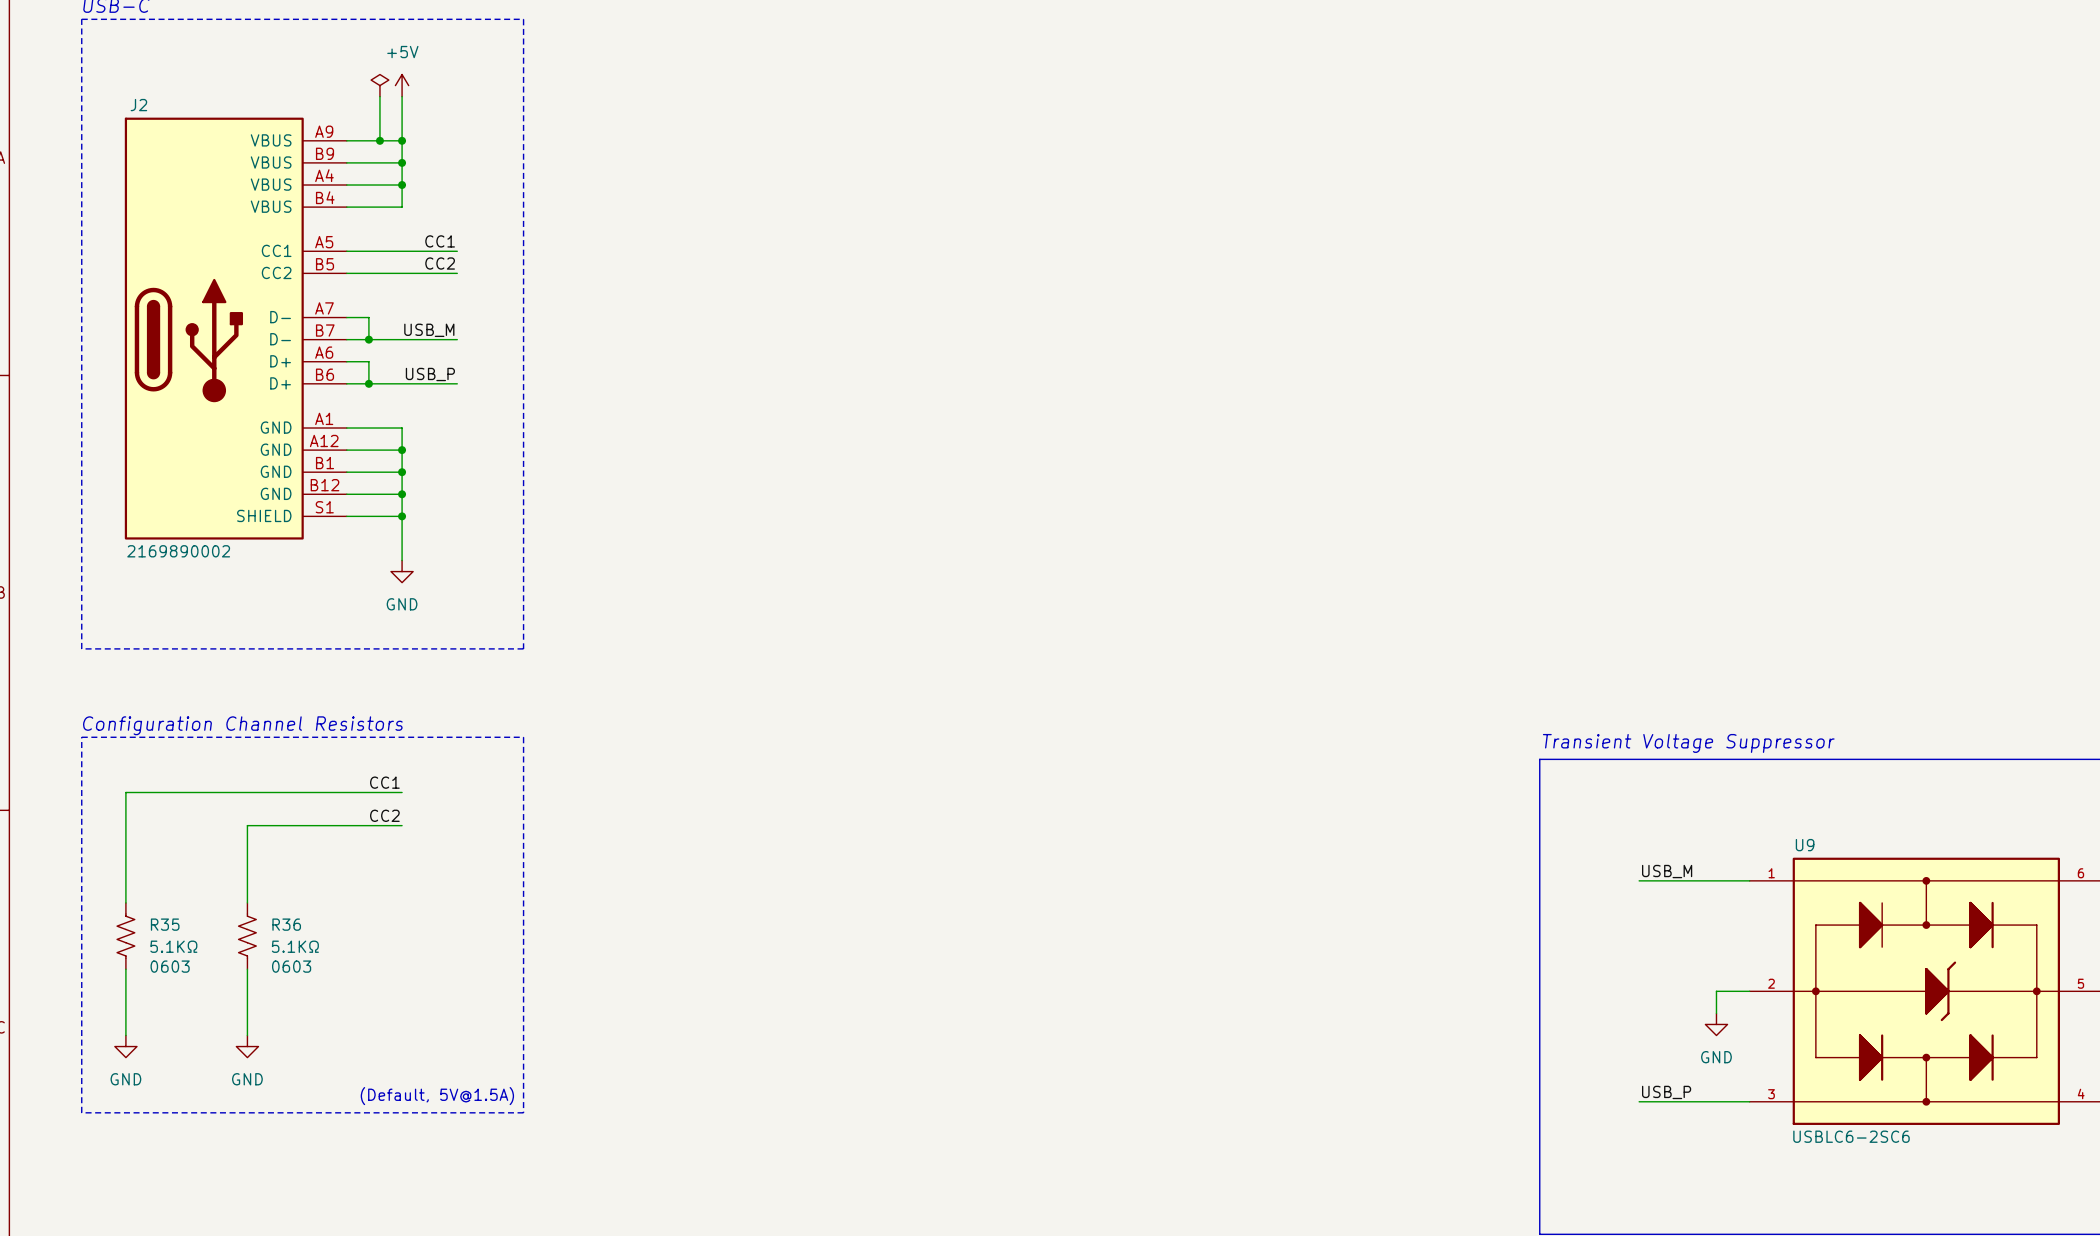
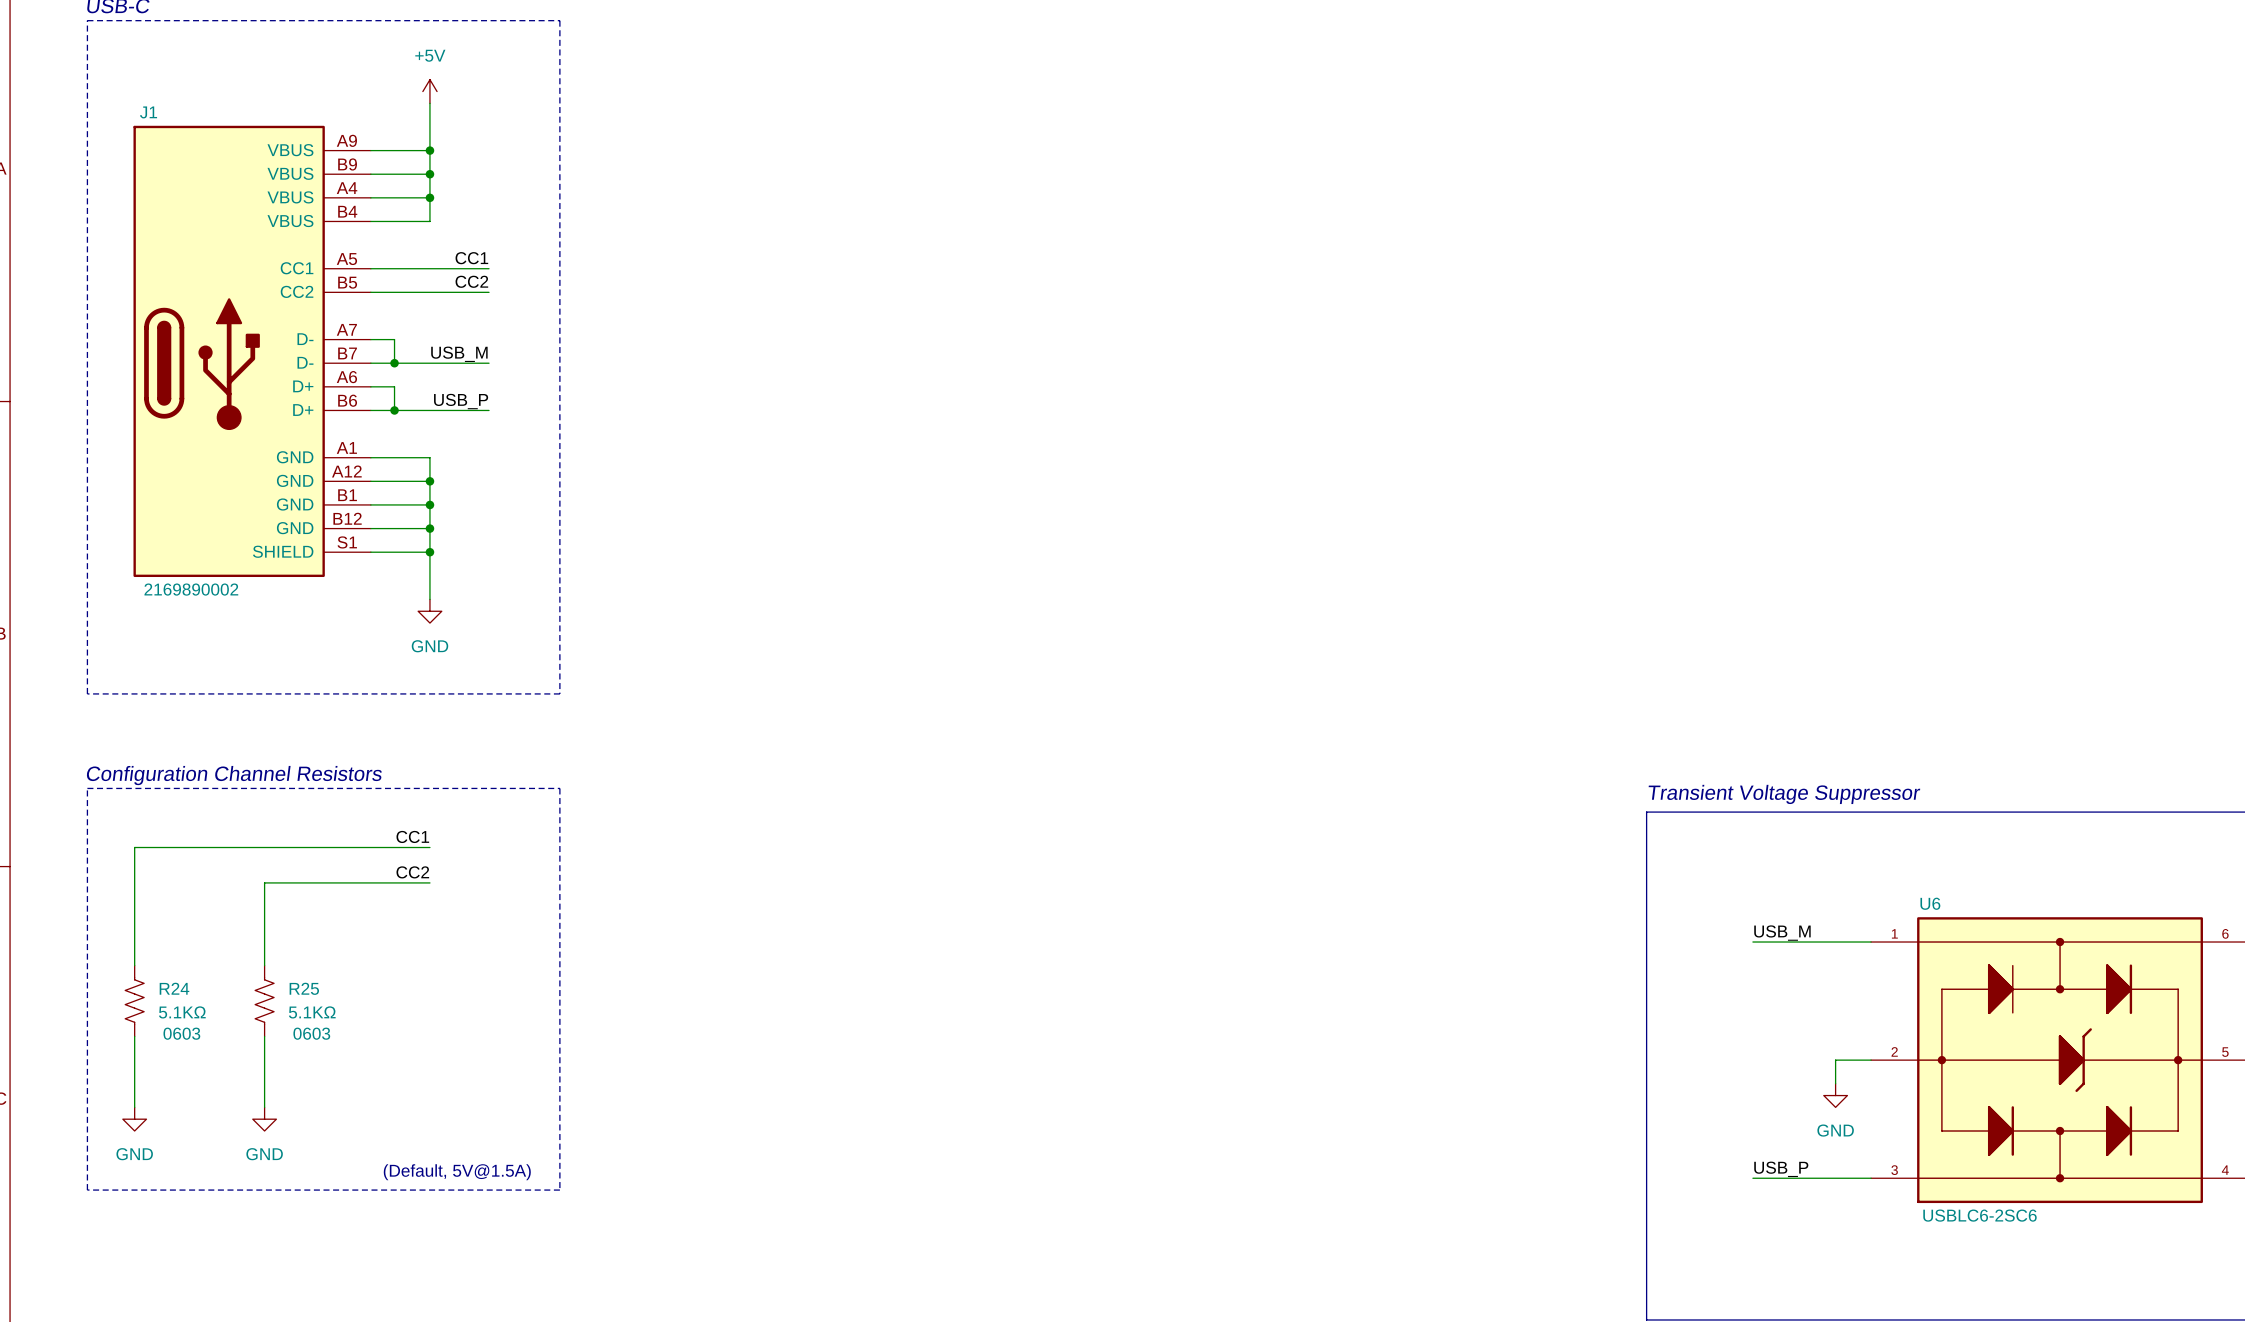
power symbol: (379, 85) -> none
wire: (379, 96) (379, 140) -> none
J2 name: J2 (138, 105) -> J1 (148, 112)
junction: (379, 140) -> none
U9 name: U9 (1805, 845) -> U6 (1930, 903)
R35 name: R35 (165, 924) -> R24 (174, 988)
R36 name: R36 (286, 924) -> R25 (304, 988)

